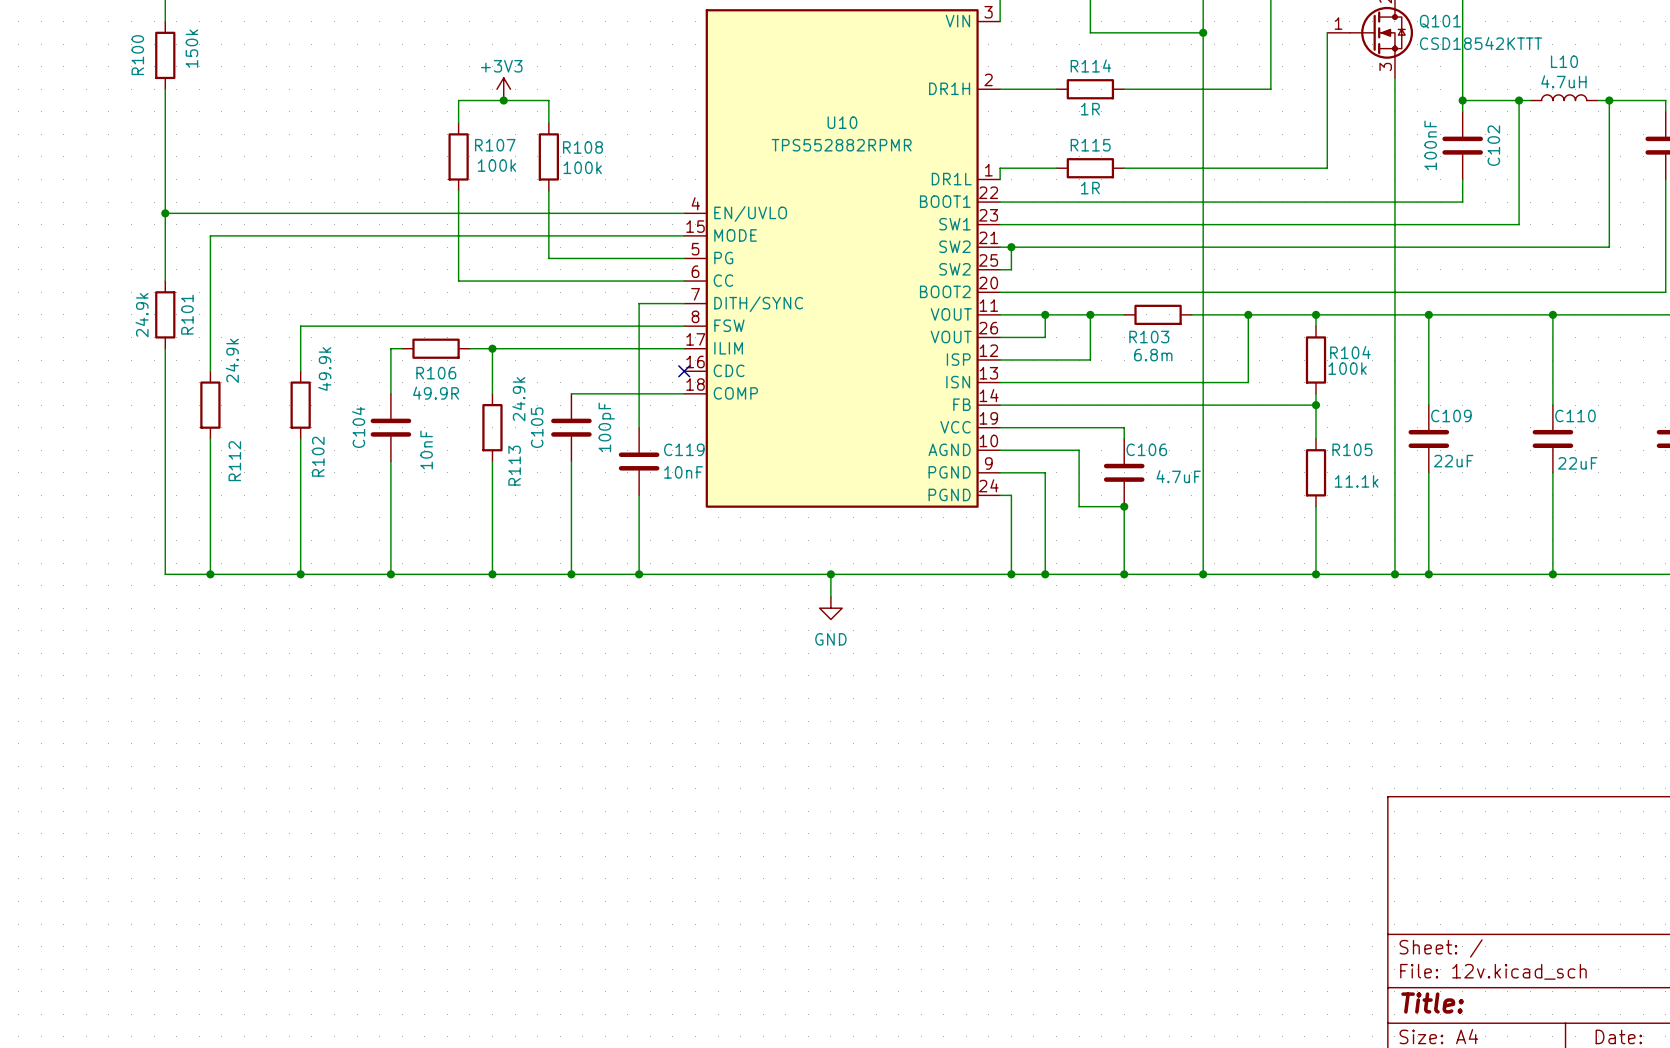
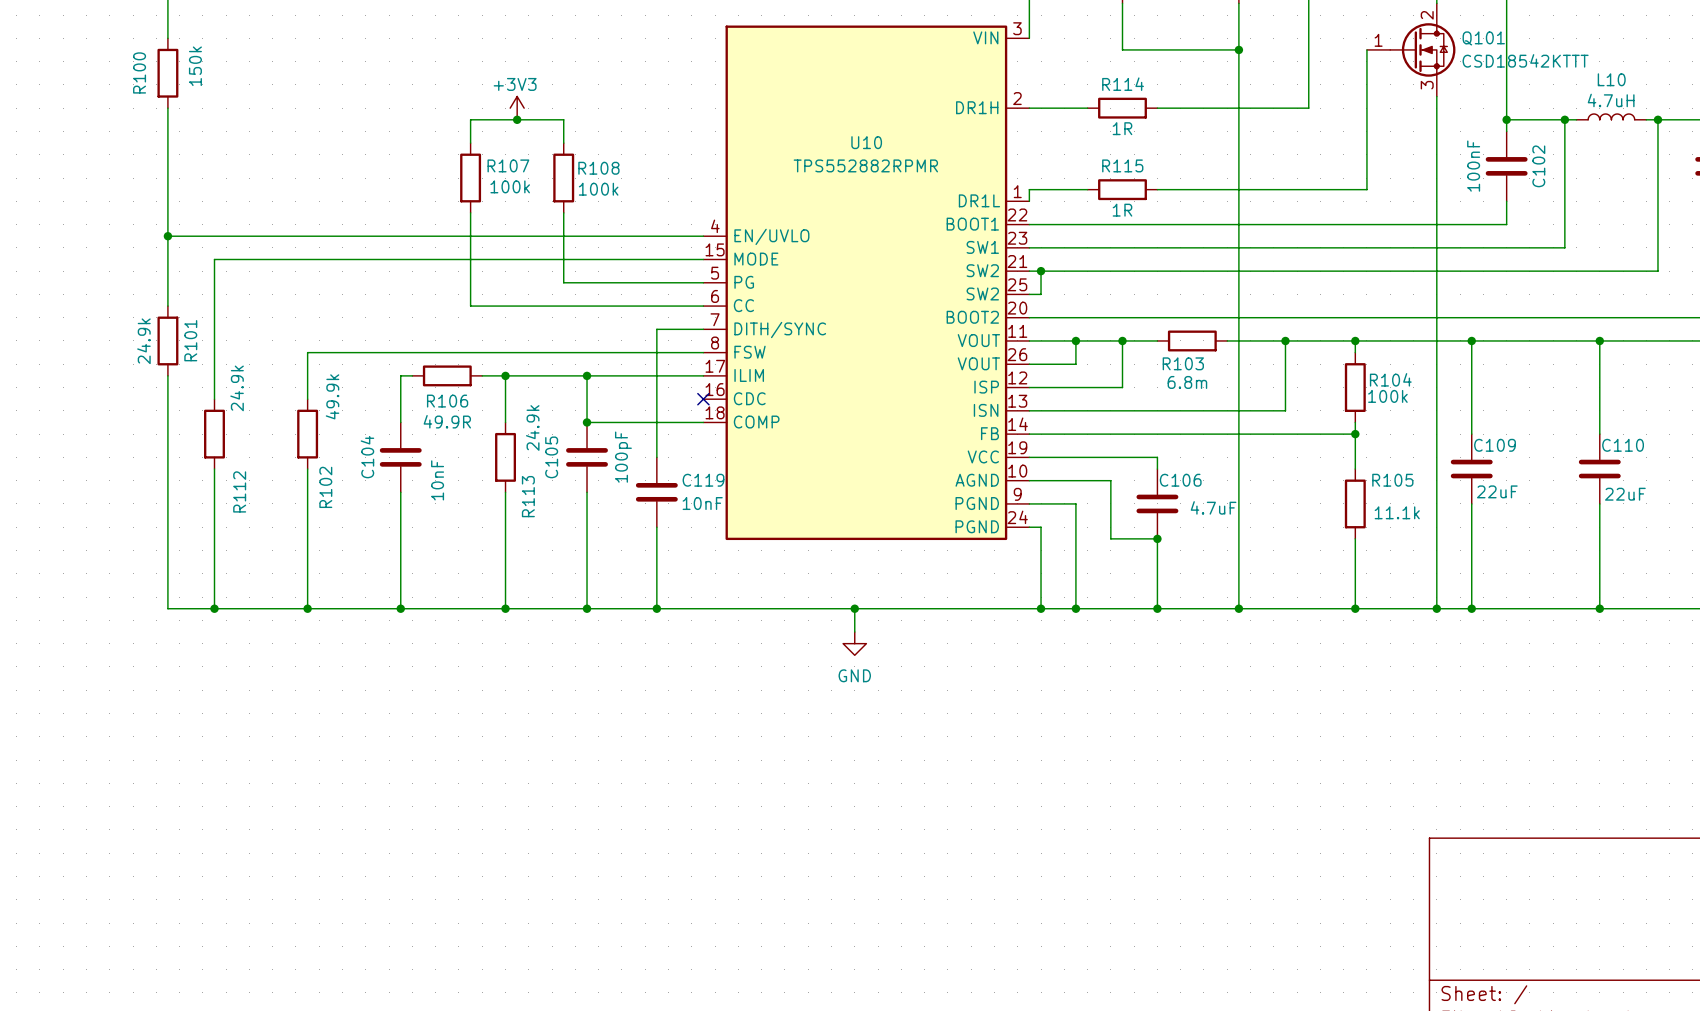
wire: none -> (587, 375) (587, 422)
junction: none -> (587, 375)
junction: none -> (587, 422)

